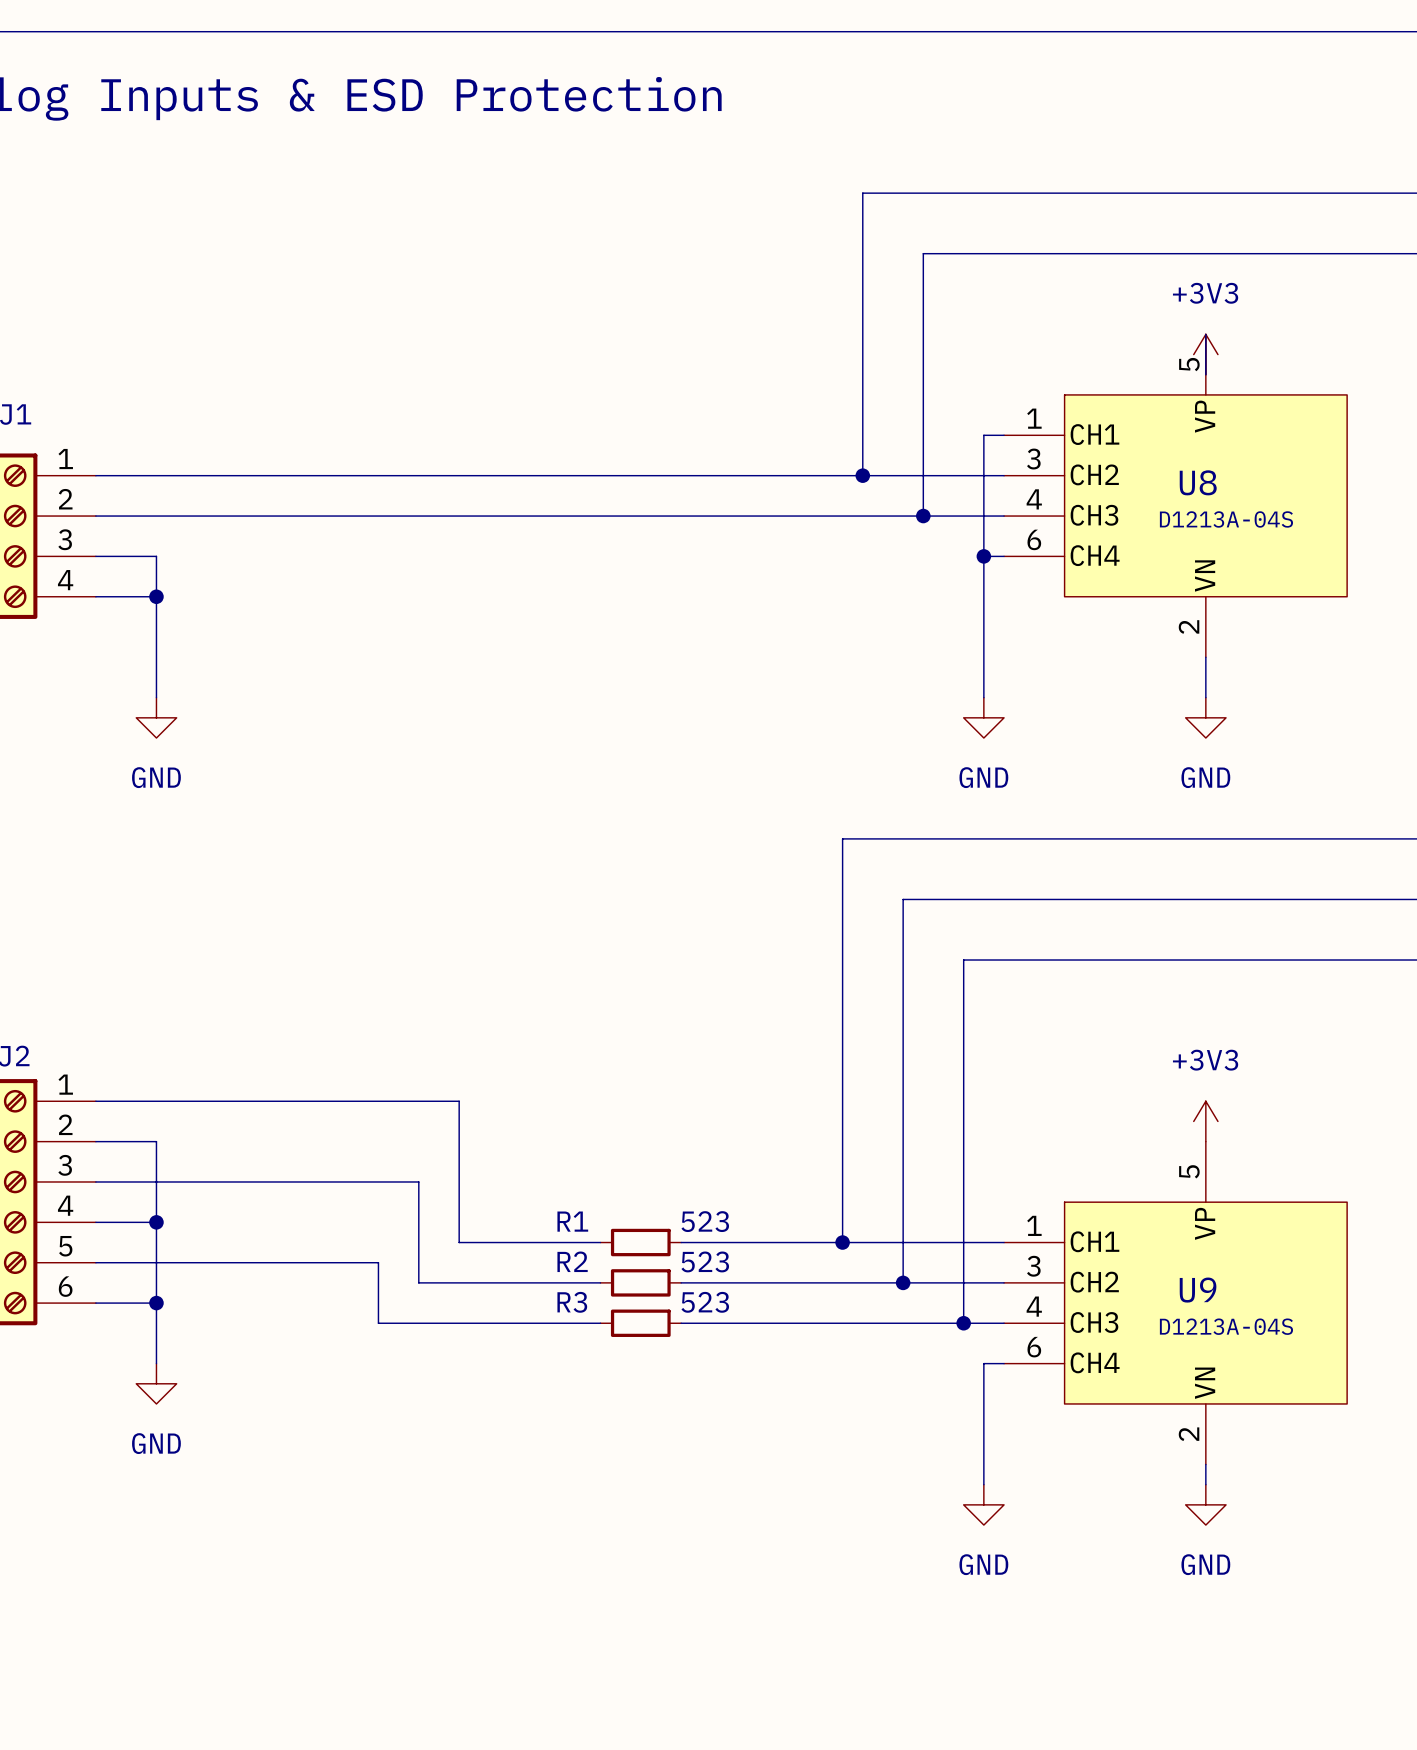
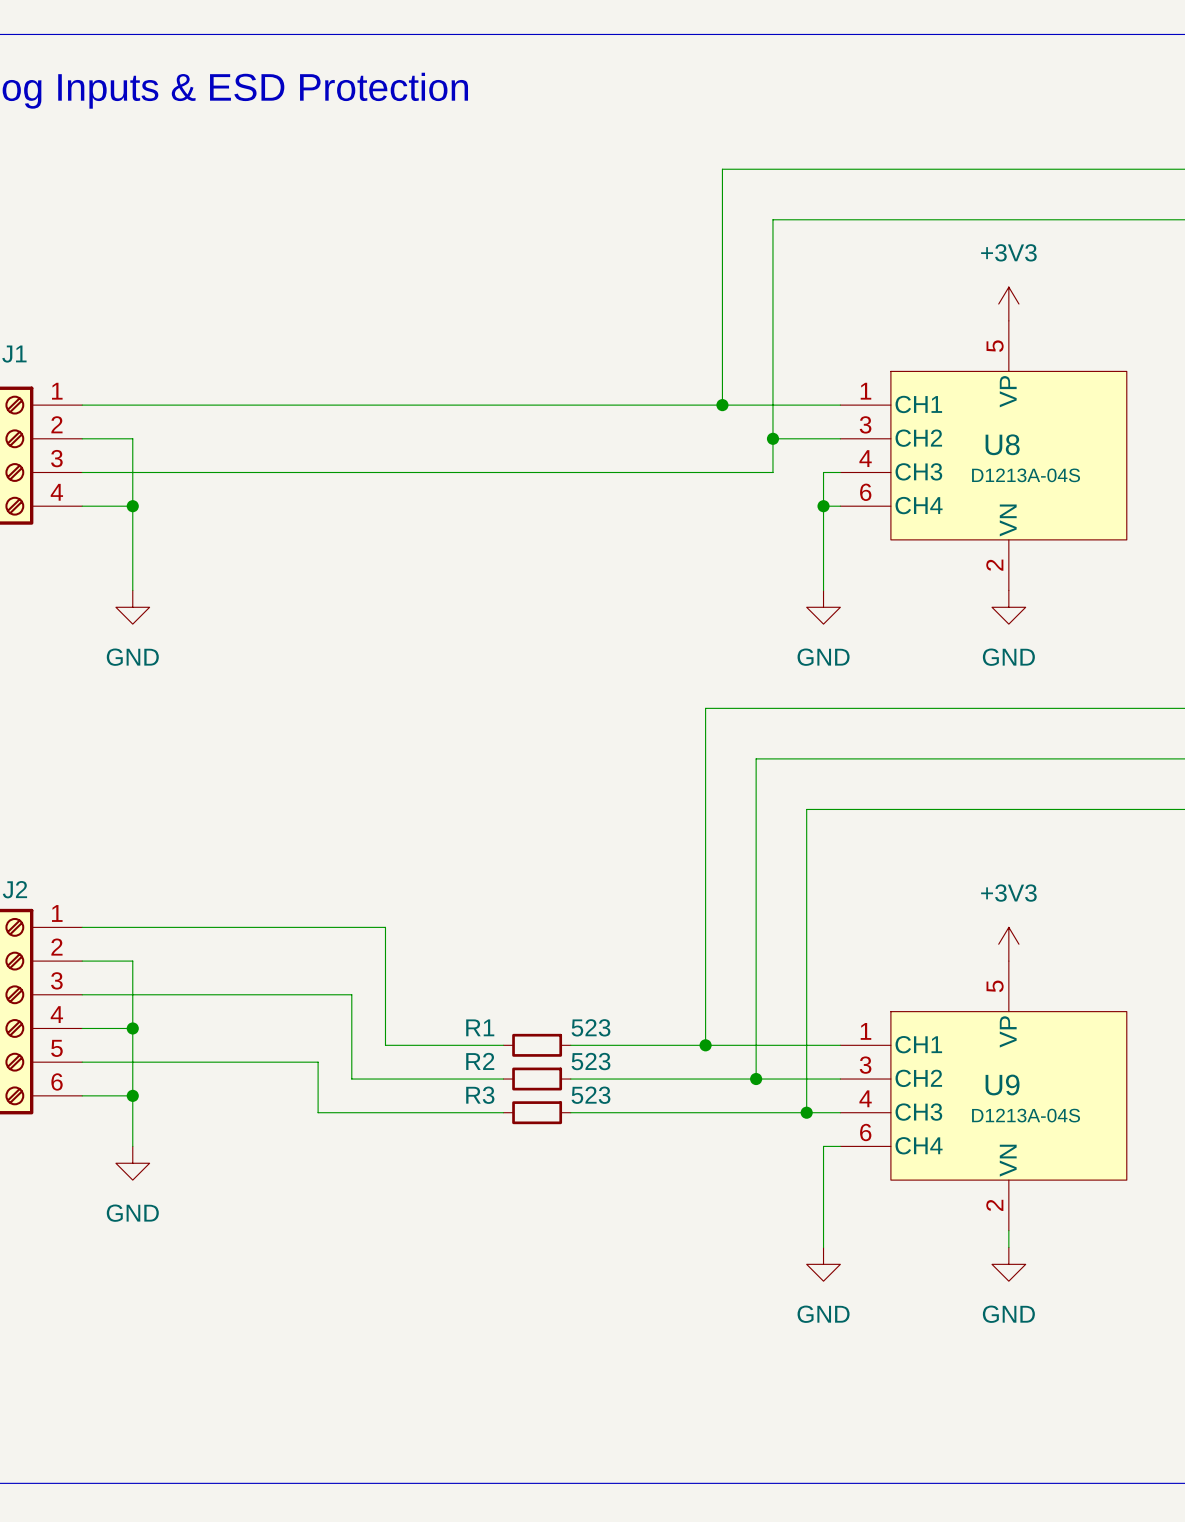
wire: (1004, 435) (983, 435) (983, 556) -> none
U8 position: (1175, 495) -> (983, 455)
wire: (156, 516) (923, 516) -> (132, 438) (132, 472) (772, 472) (772, 438)
junction position: (983, 556) -> (823, 506)
wire: none -> (823, 506) (840, 506)

